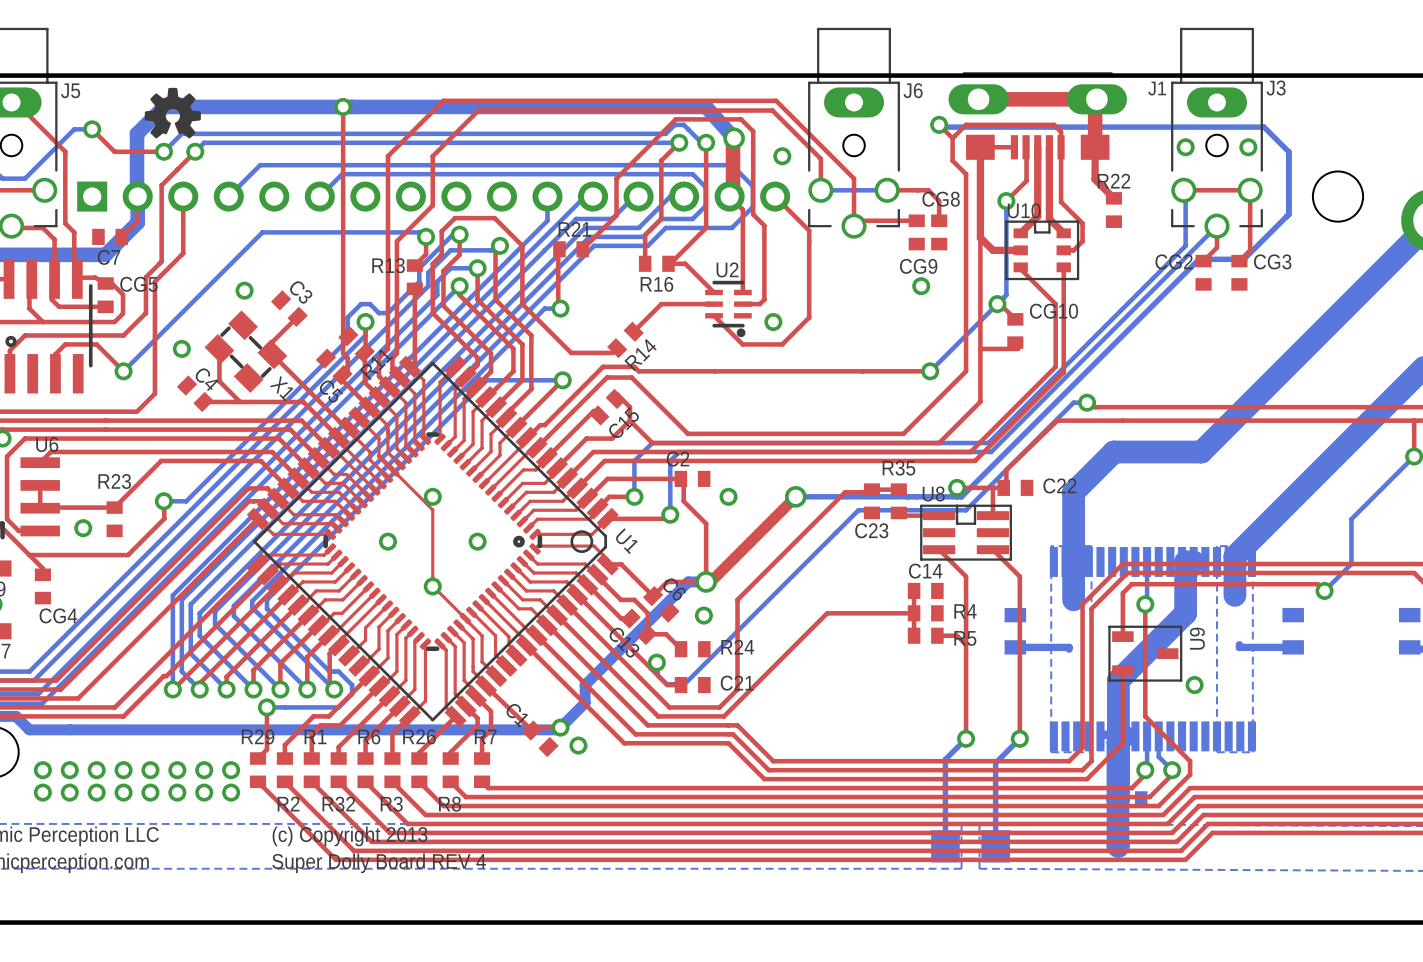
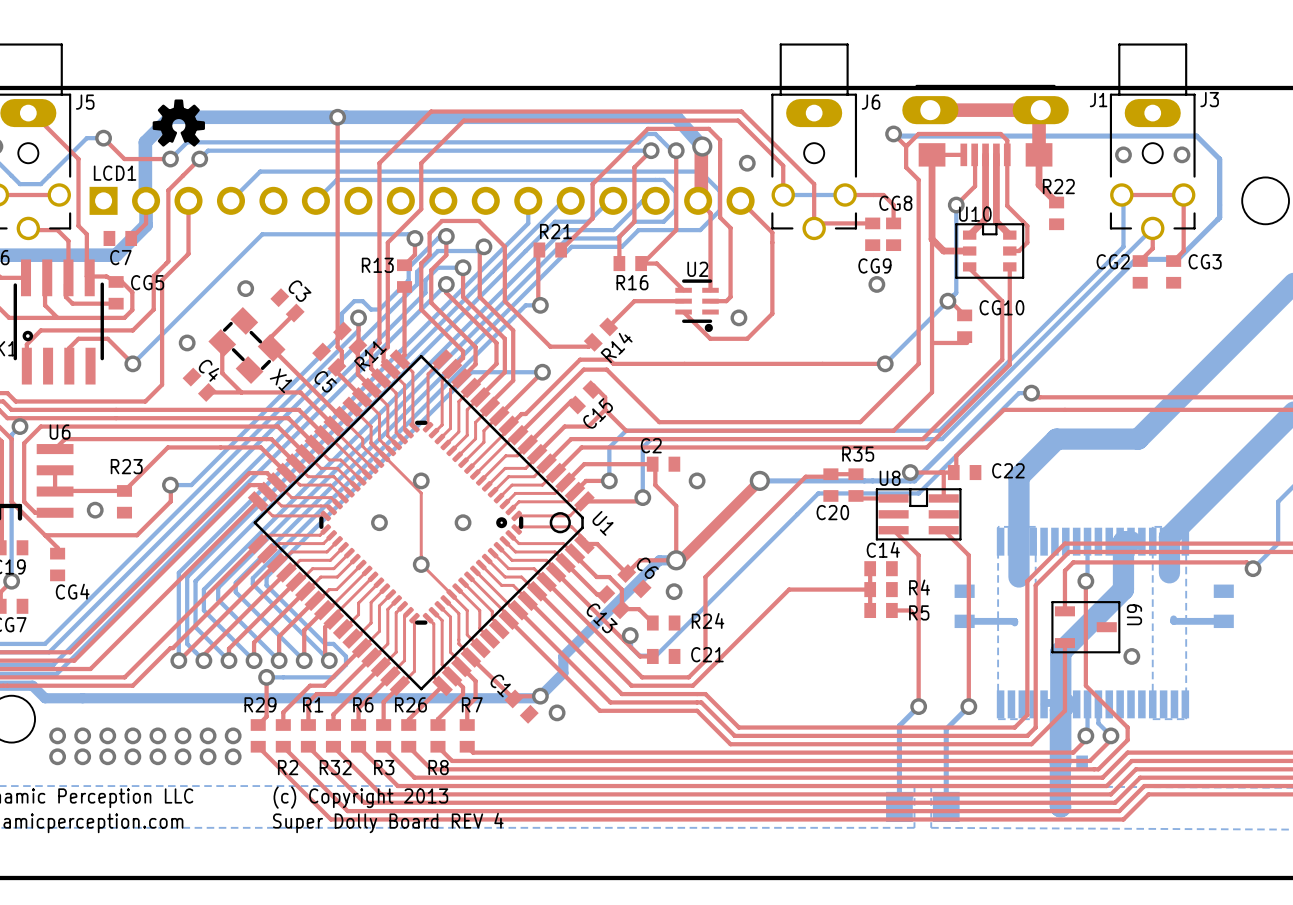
text: none -> LCD1 (115, 173)
C23 name: C23 (871, 530) -> C20 (832, 512)

